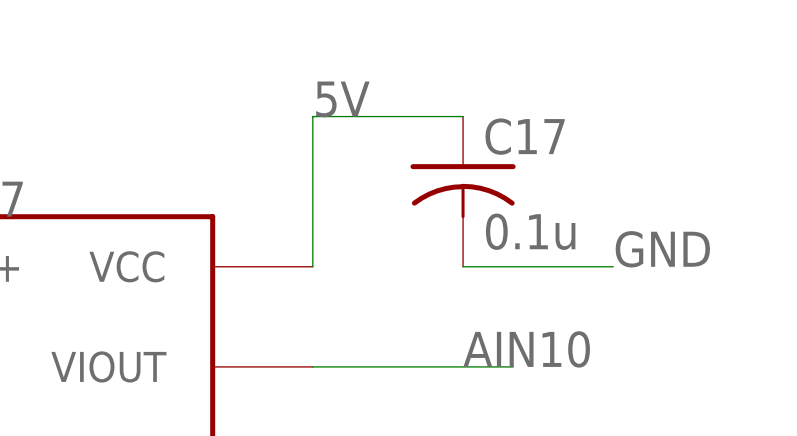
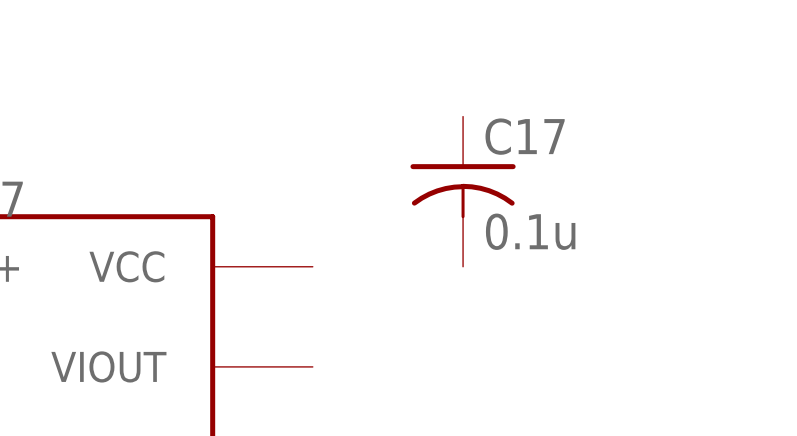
label: 5V (342, 99) -> none
wire: (463, 116) (312, 116) (312, 266) -> none
label: GND (662, 249) -> none
wire: (463, 266) (613, 266) -> none
label: AIN10 (526, 349) -> none
wire: (312, 366) (513, 366) -> none

